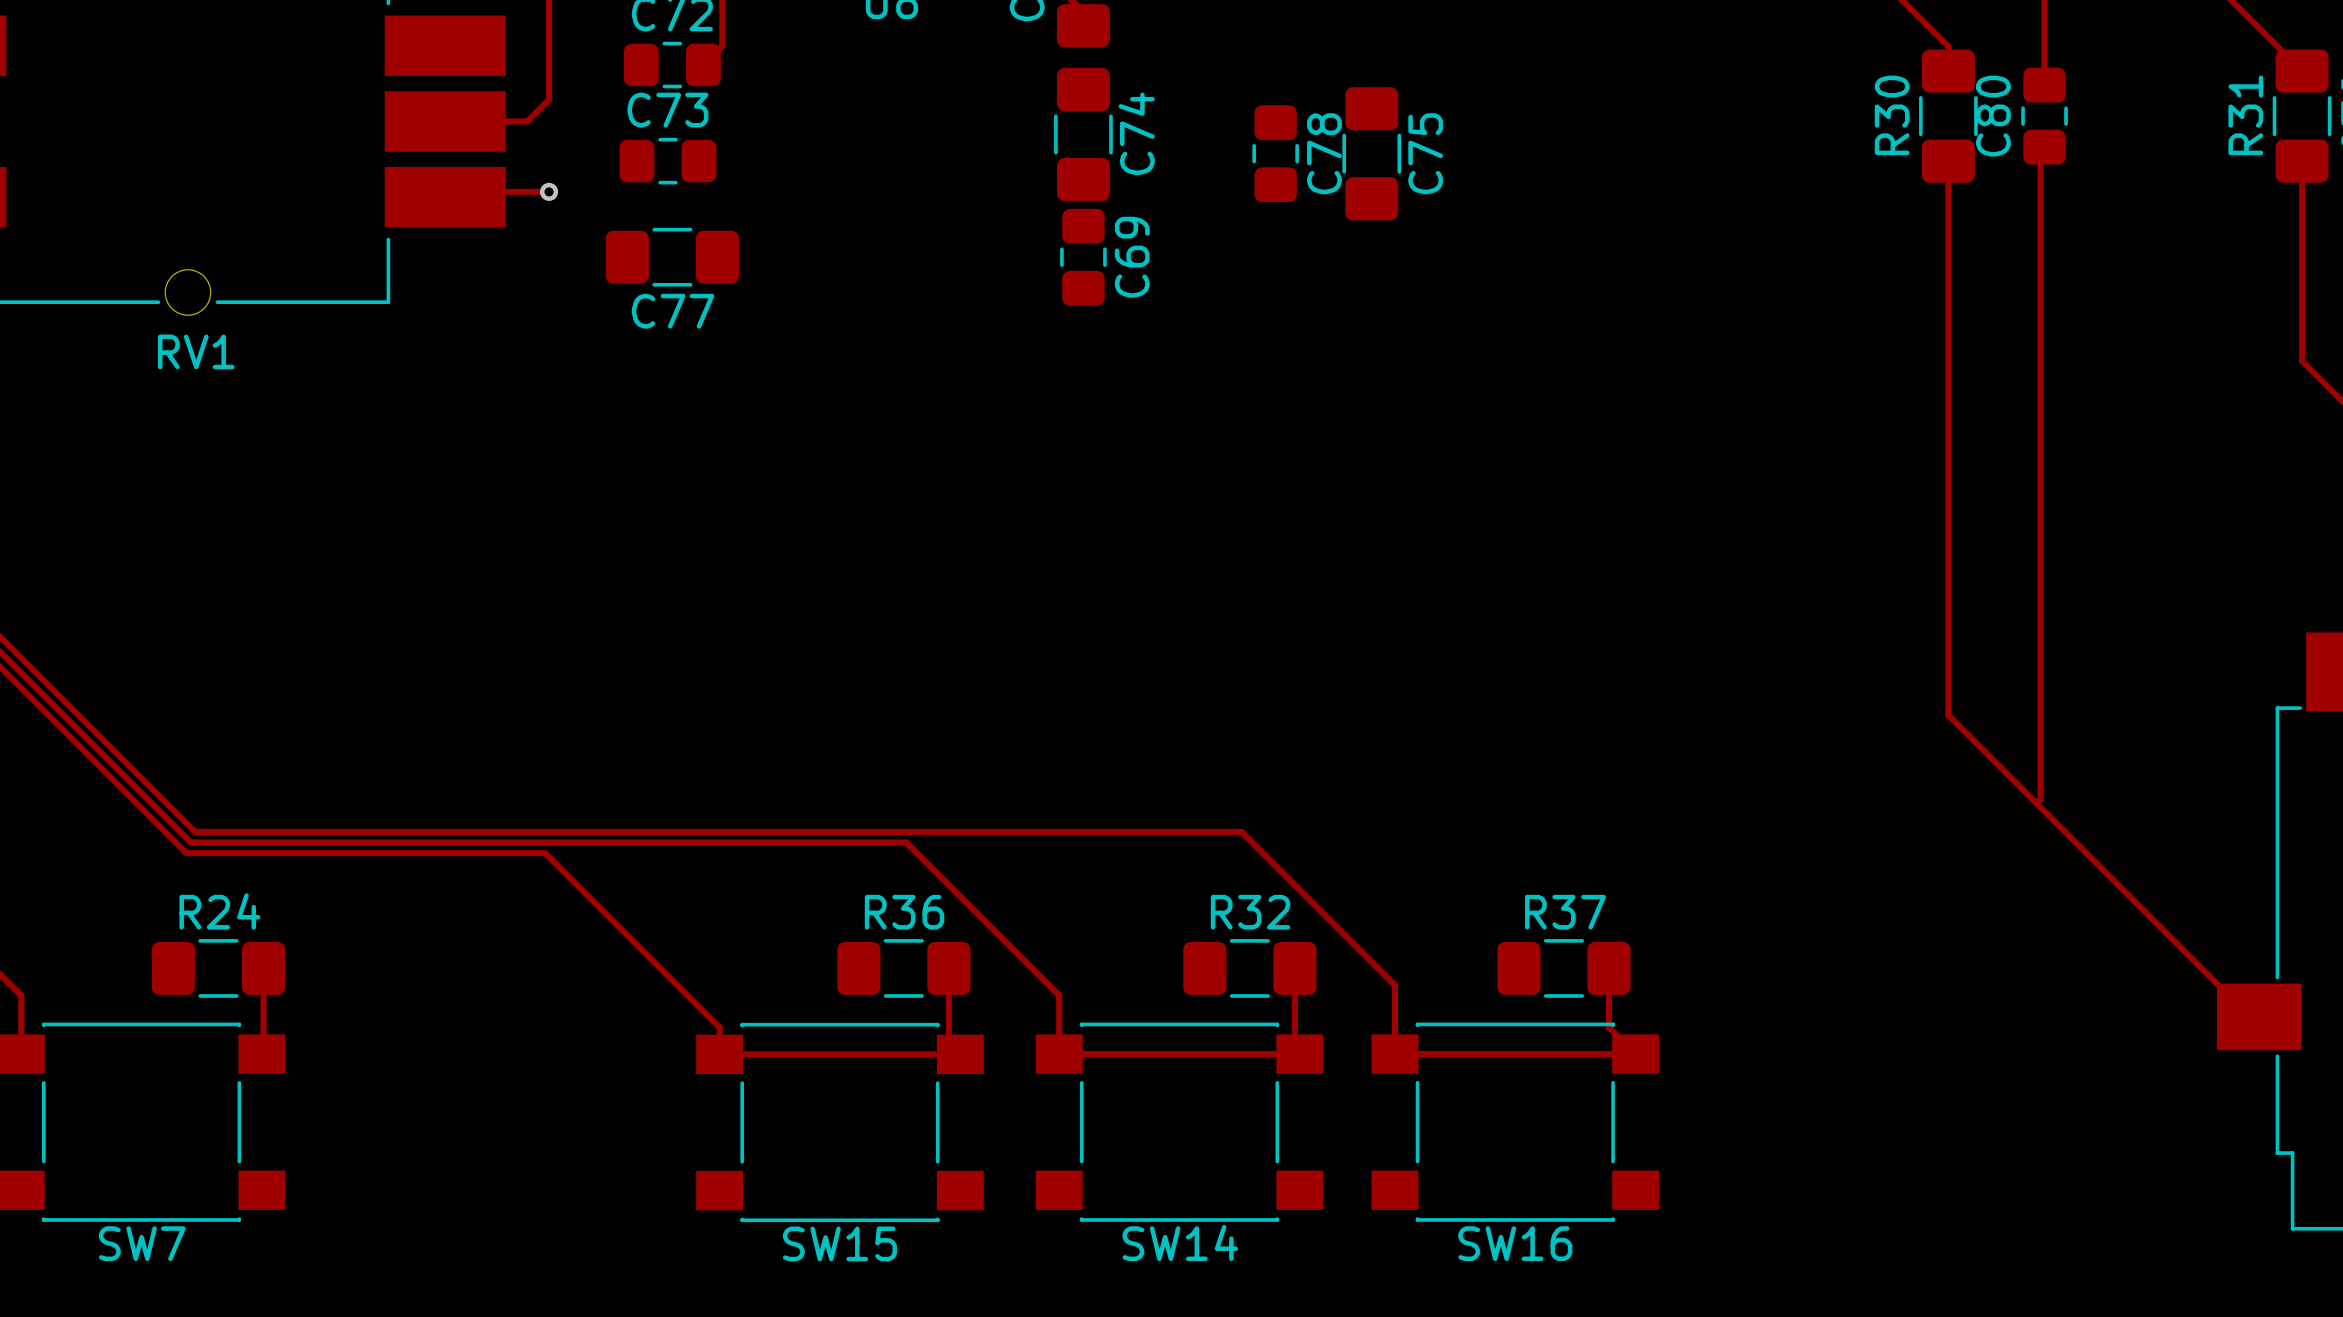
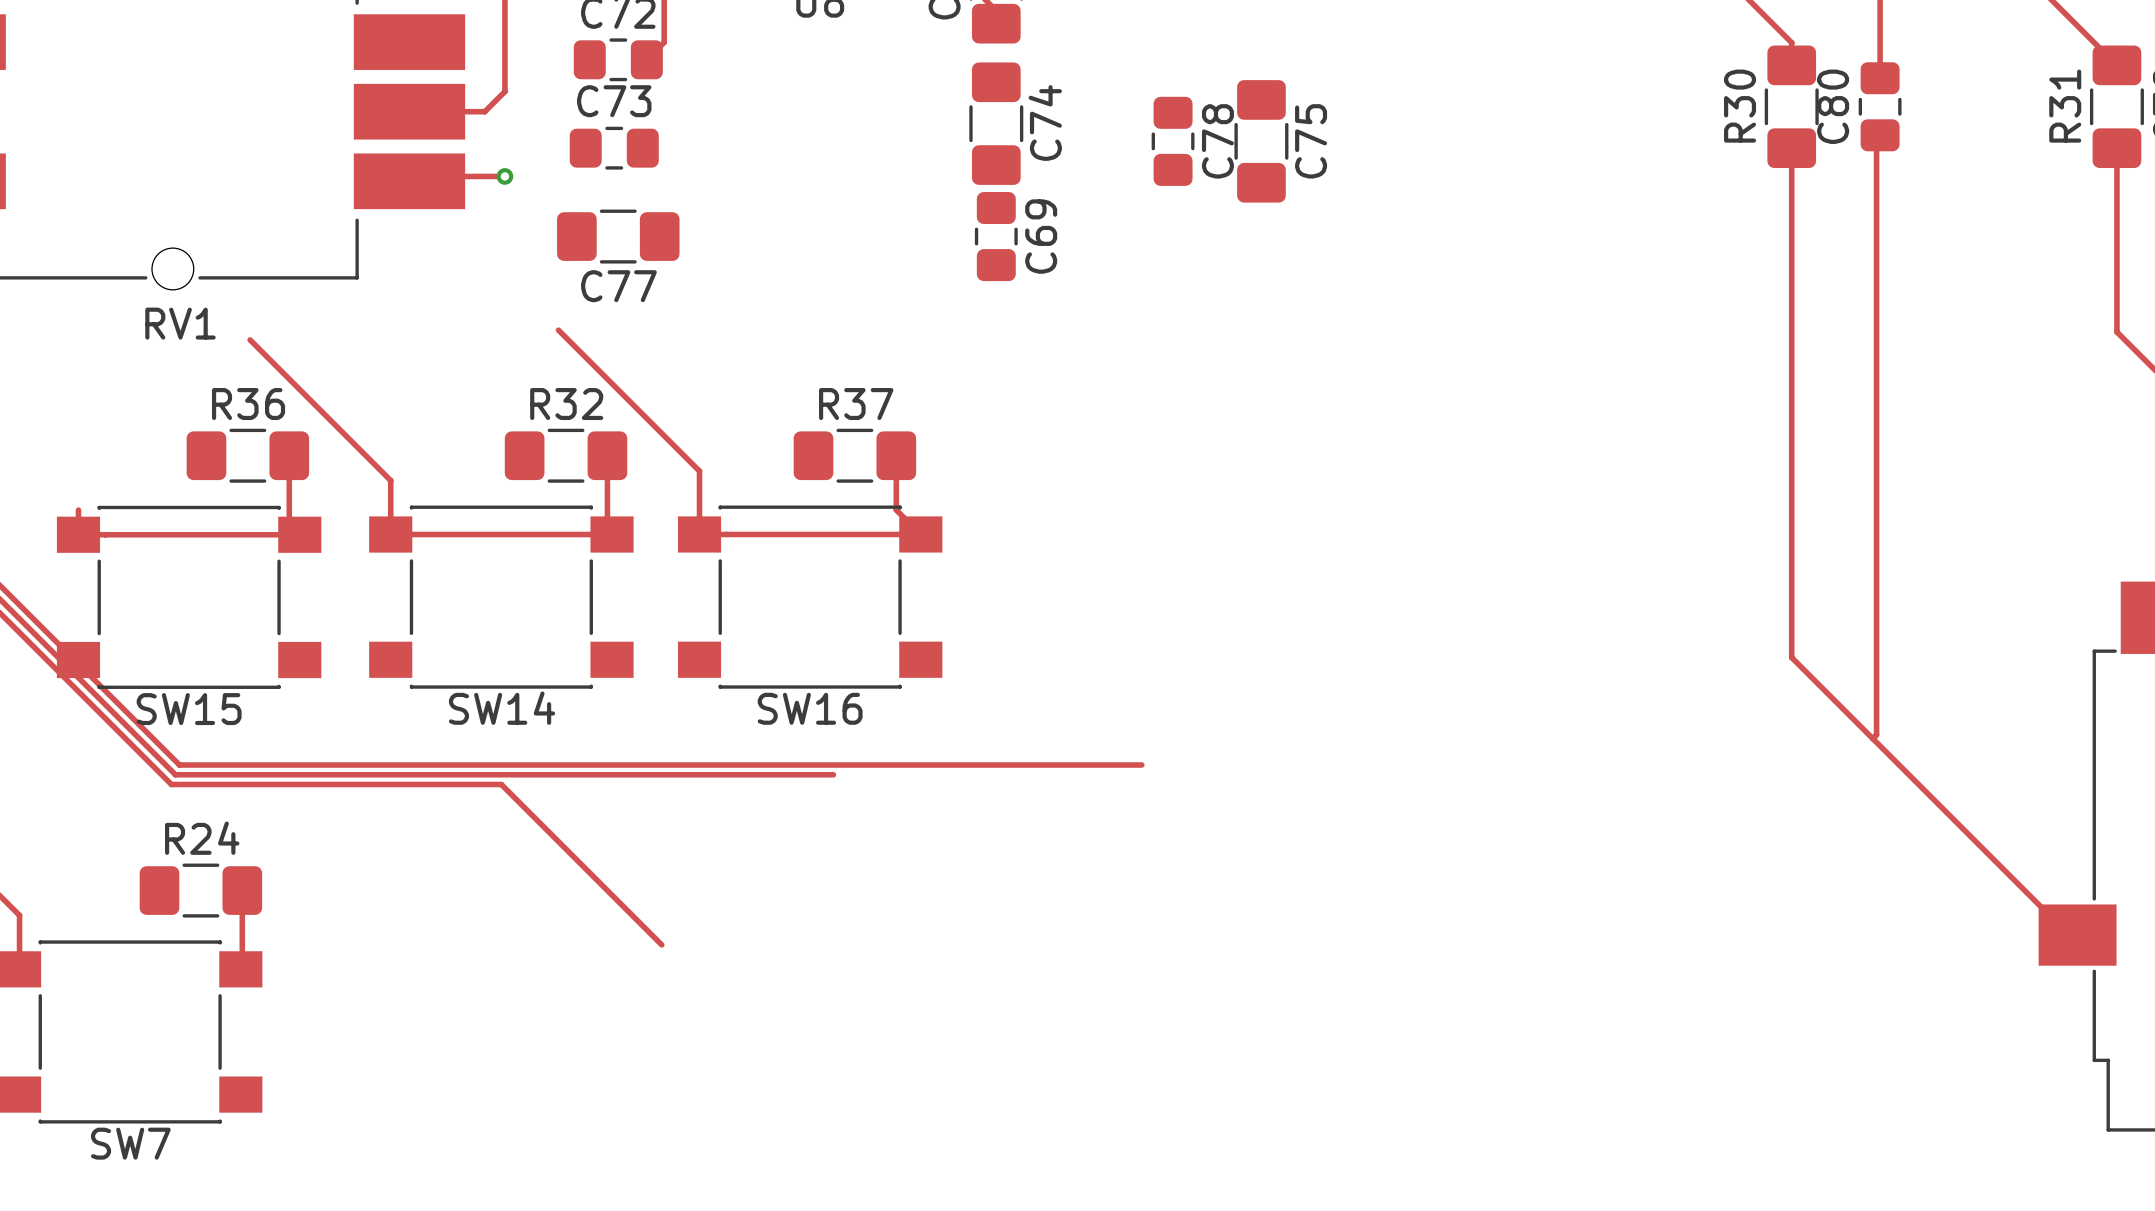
top track: none -> (558, 330) (699, 471) (699, 534) (920, 534) (896, 509) (896, 455)
top track: none -> (250, 339) (390, 480) (390, 534) (612, 534) (607, 529) (607, 477)
top track: none -> (289, 455) (289, 524) (299, 534) (78, 534) (78, 510)
top track: (1241, 831) (1394, 985) (1394, 1054) (1635, 1054) (1608, 1027) (1608, 968) -> none
top track: (906, 842) (1059, 995) (1059, 1054) (1299, 1054) (1294, 1049) (1294, 992) -> none
R36 position: (903, 968) -> (247, 455)
top track: (948, 968) (948, 1042) (960, 1054) (719, 1054) (719, 1027) -> none
R32 position: (1249, 968) -> (566, 455)
R37 position: (1563, 968) -> (854, 455)
SW15 position: (839, 1122) -> (189, 597)
SW14 position: (1179, 1122) -> (501, 597)
SW16 position: (1515, 1122) -> (810, 597)

